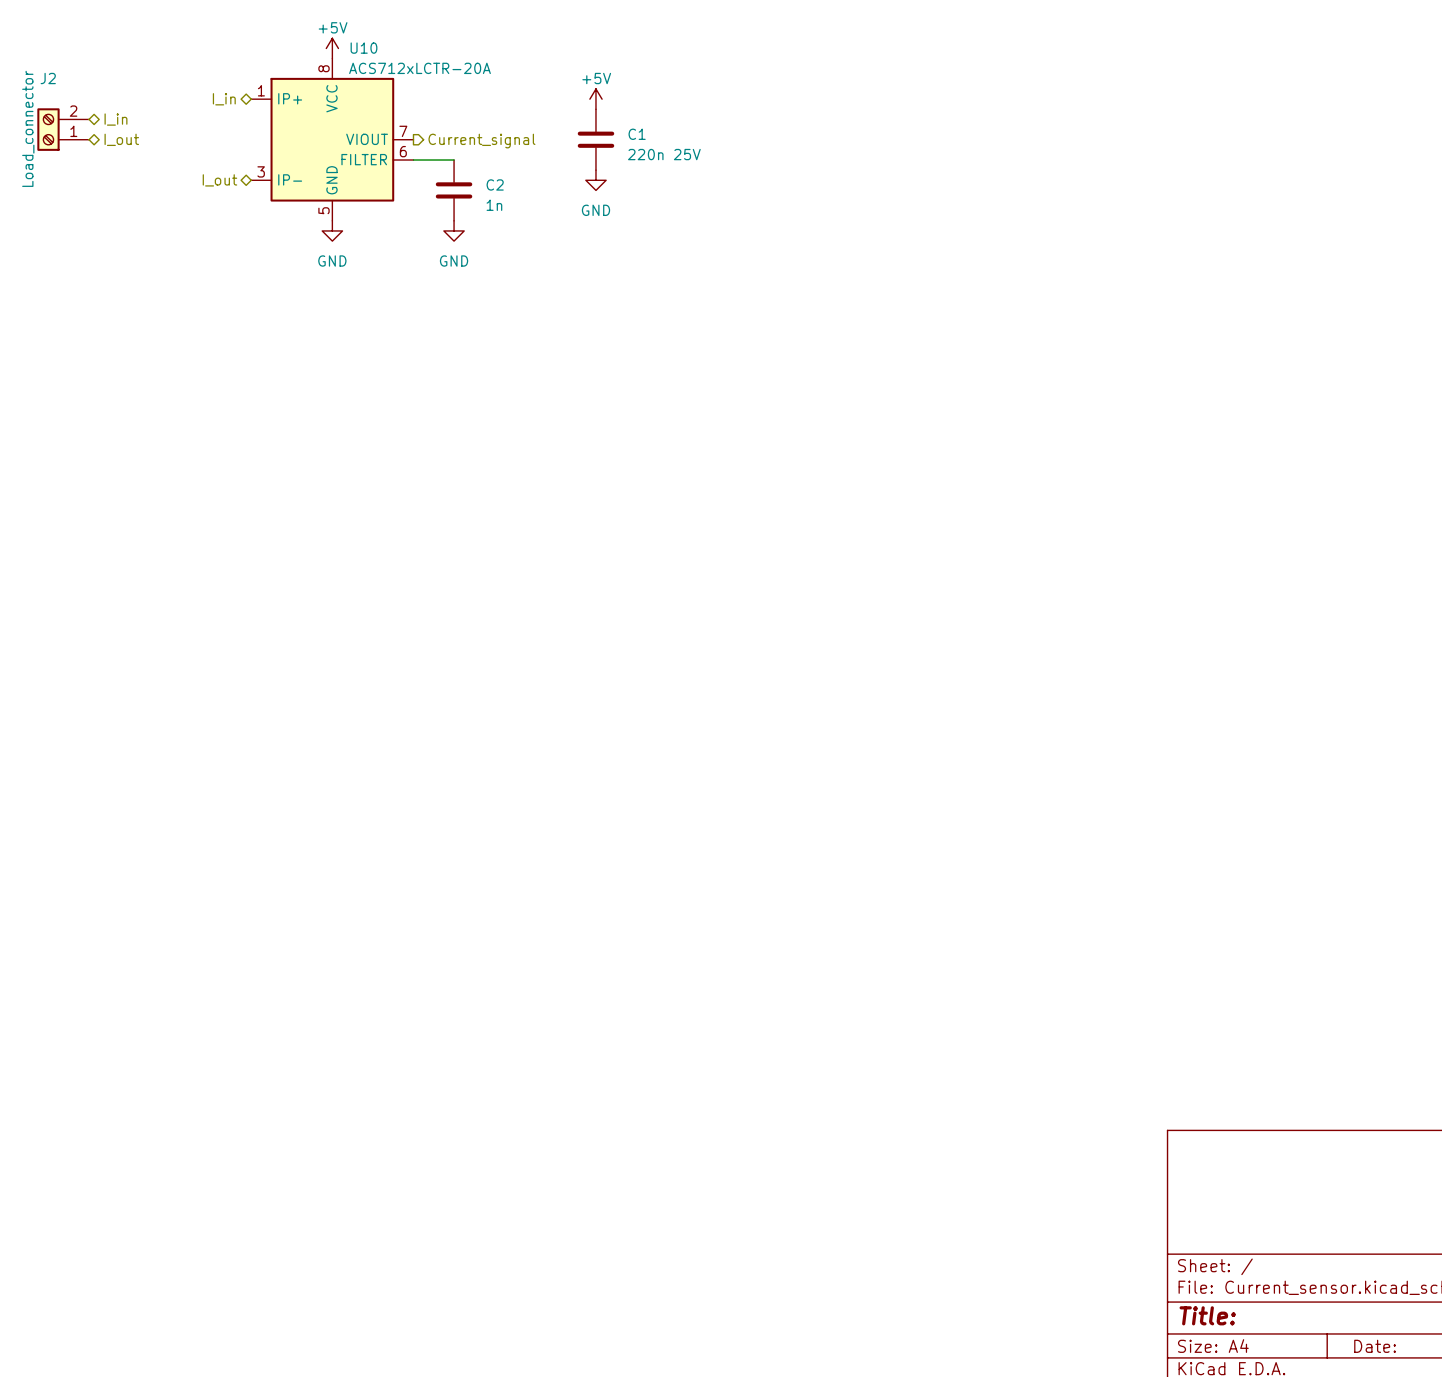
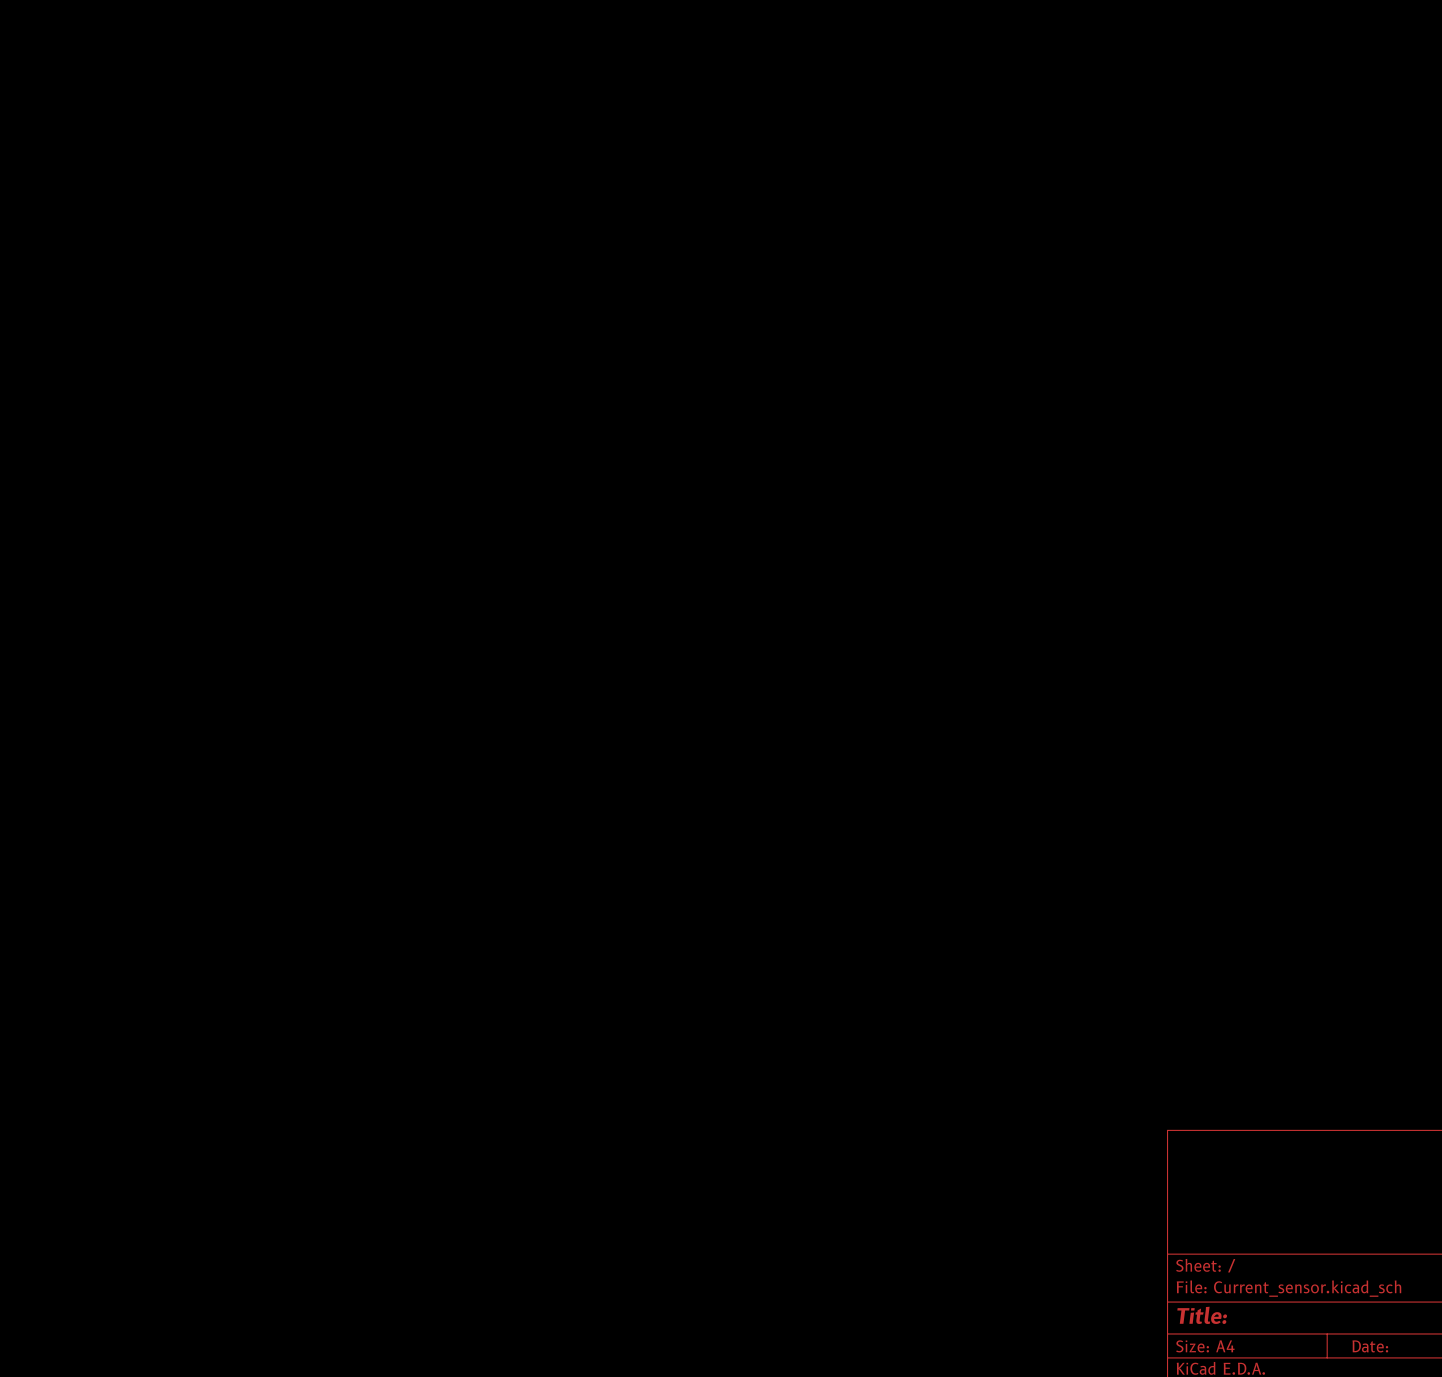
power symbol: +5V (332, 48) -> none
hierarchical label: I_in (224, 99) -> none
power symbol: +5V (595, 99) -> none
hierarchical label: I_in (115, 119) -> none
J2: Load_connector (63, 129) -> none
hierarchical label: I_out (121, 139) -> none
U10: ACS712xLCTR-20A (332, 139) -> none
C1: 220n 25V (595, 139) -> none
hierarchical label: Current_signal (481, 141) -> none
wire: (413, 160) (454, 160) -> none
hierarchical label: I_out (219, 180) -> none
power symbol: GND (595, 180) -> none
C2: 1n (454, 190) -> none
power symbol: GND (332, 230) -> none
power symbol: GND (454, 230) -> none

